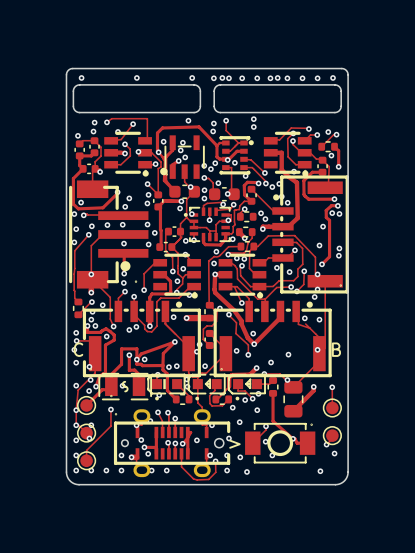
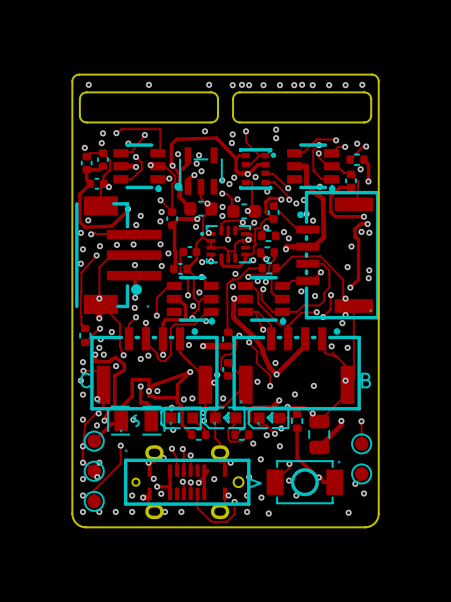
part footprint: [82, 300, 201, 378] -> [90, 327, 219, 411]
part footprint: [147, 373, 186, 401] -> [160, 406, 202, 430]
part footprint: [187, 373, 226, 401] -> [204, 406, 246, 430]
part footprint: [227, 373, 266, 401] -> [247, 406, 290, 430]
part footprint: [113, 409, 231, 478] -> [123, 445, 251, 520]

